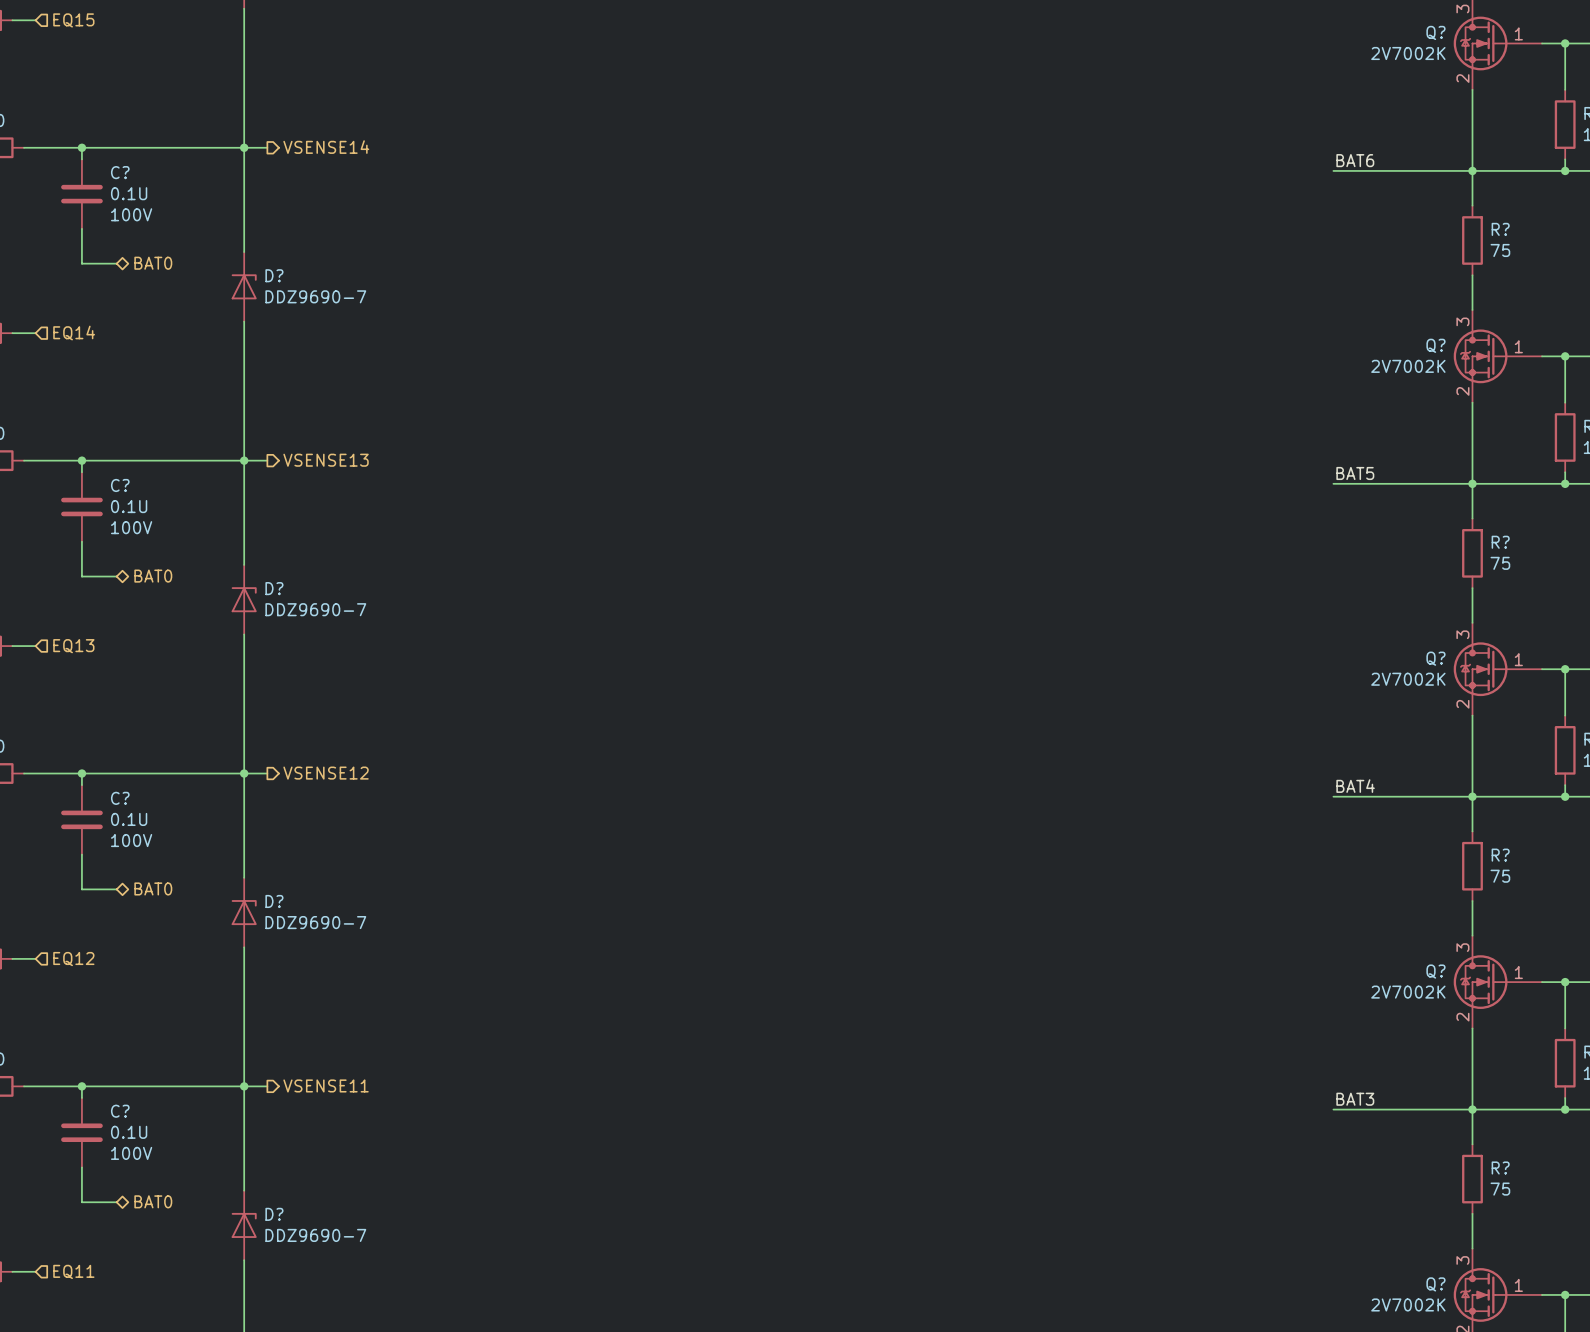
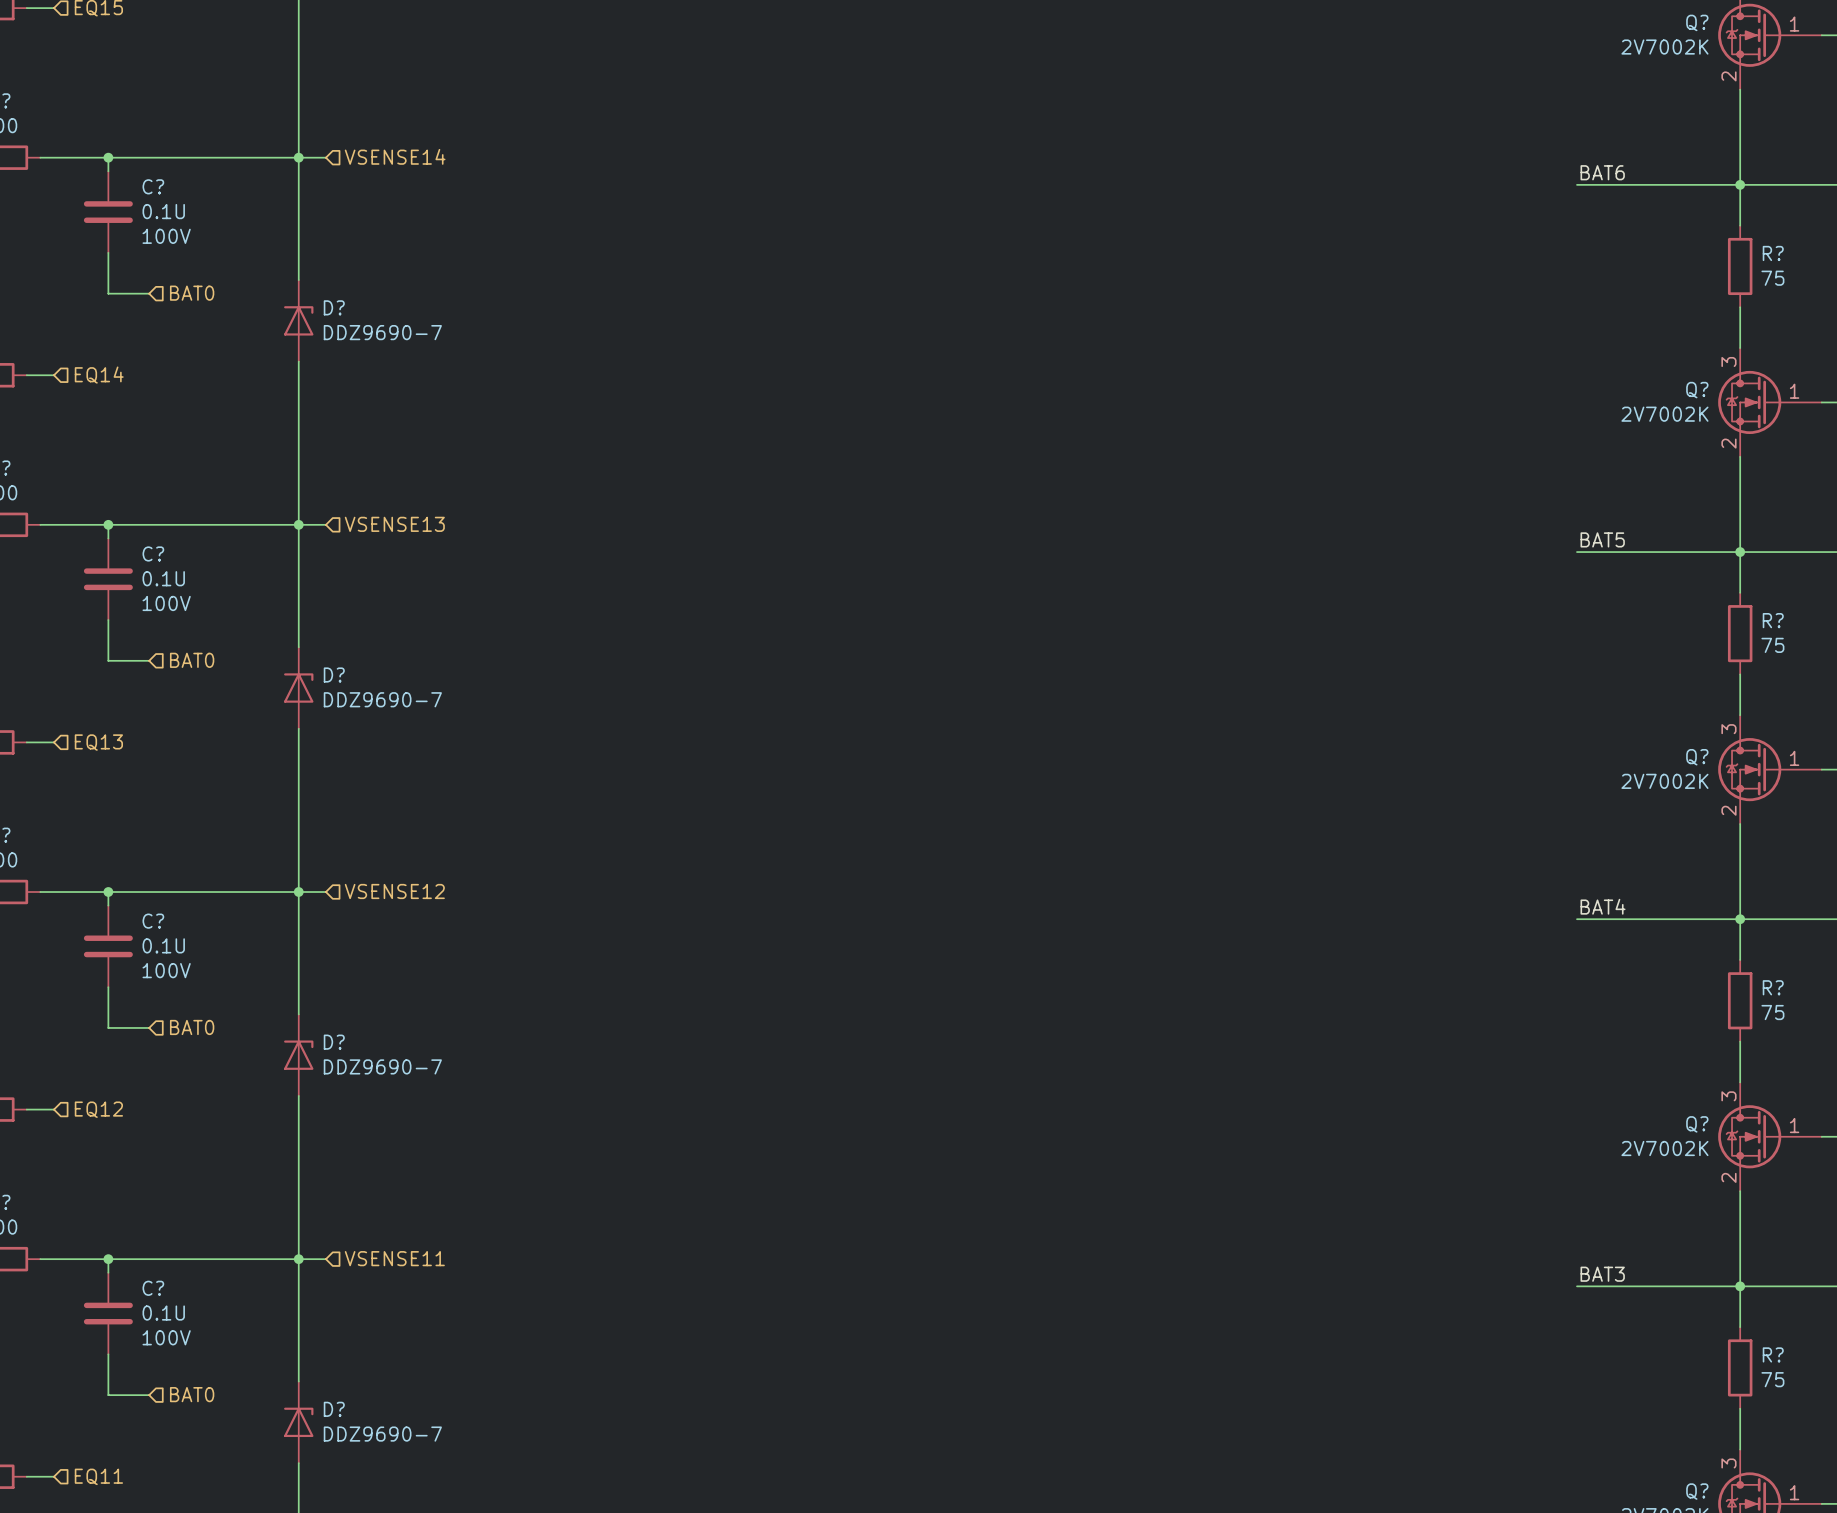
hierarchical label shape: output (326, 147) -> input (395, 156)
hierarchical label shape: bidirectional (153, 263) -> input (192, 293)
hierarchical label shape: output (326, 460) -> input (394, 524)
hierarchical label shape: bidirectional (153, 576) -> input (192, 660)
hierarchical label shape: output (326, 773) -> input (394, 891)
hierarchical label shape: bidirectional (153, 888) -> input (192, 1027)
hierarchical label shape: output (326, 1085) -> input (394, 1258)
hierarchical label shape: bidirectional (153, 1201) -> input (192, 1394)

